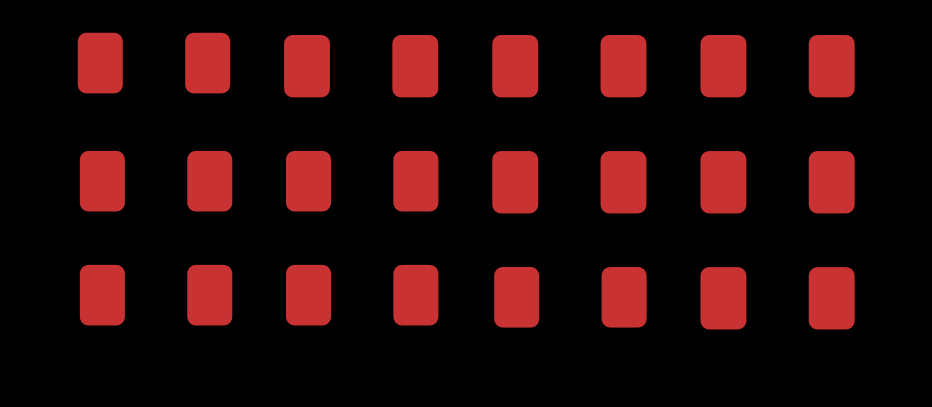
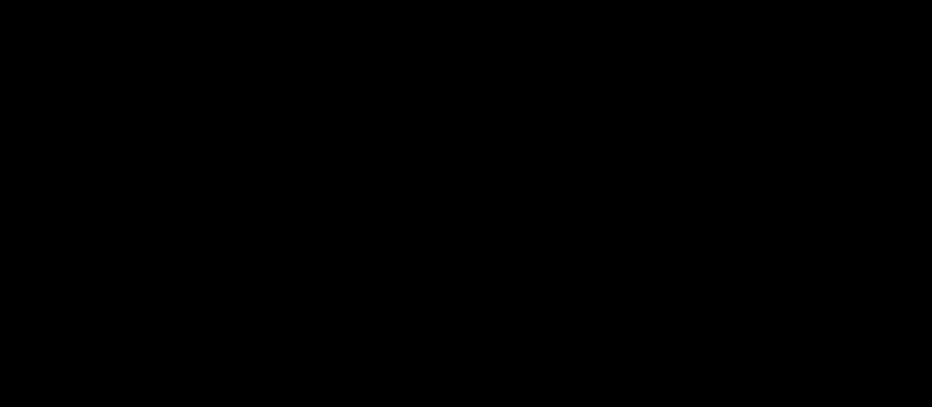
part: (153, 63) -> none
part: (361, 66) -> none
part: (569, 66) -> none
part: (777, 66) -> none
part: (156, 181) -> none
part: (362, 181) -> none
part: (569, 182) -> none
part: (777, 182) -> none
part: (156, 295) -> none
part: (362, 295) -> none
part: (570, 297) -> none
part: (777, 298) -> none

